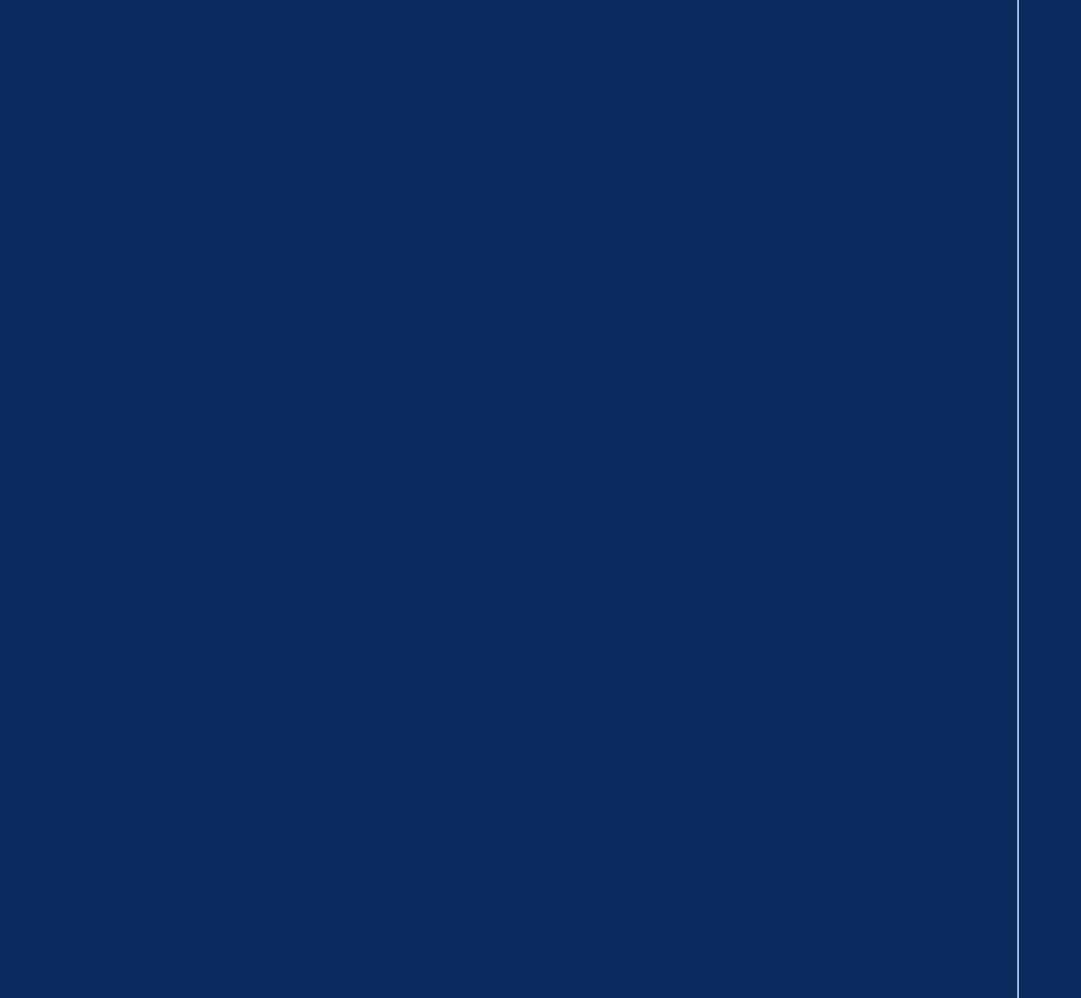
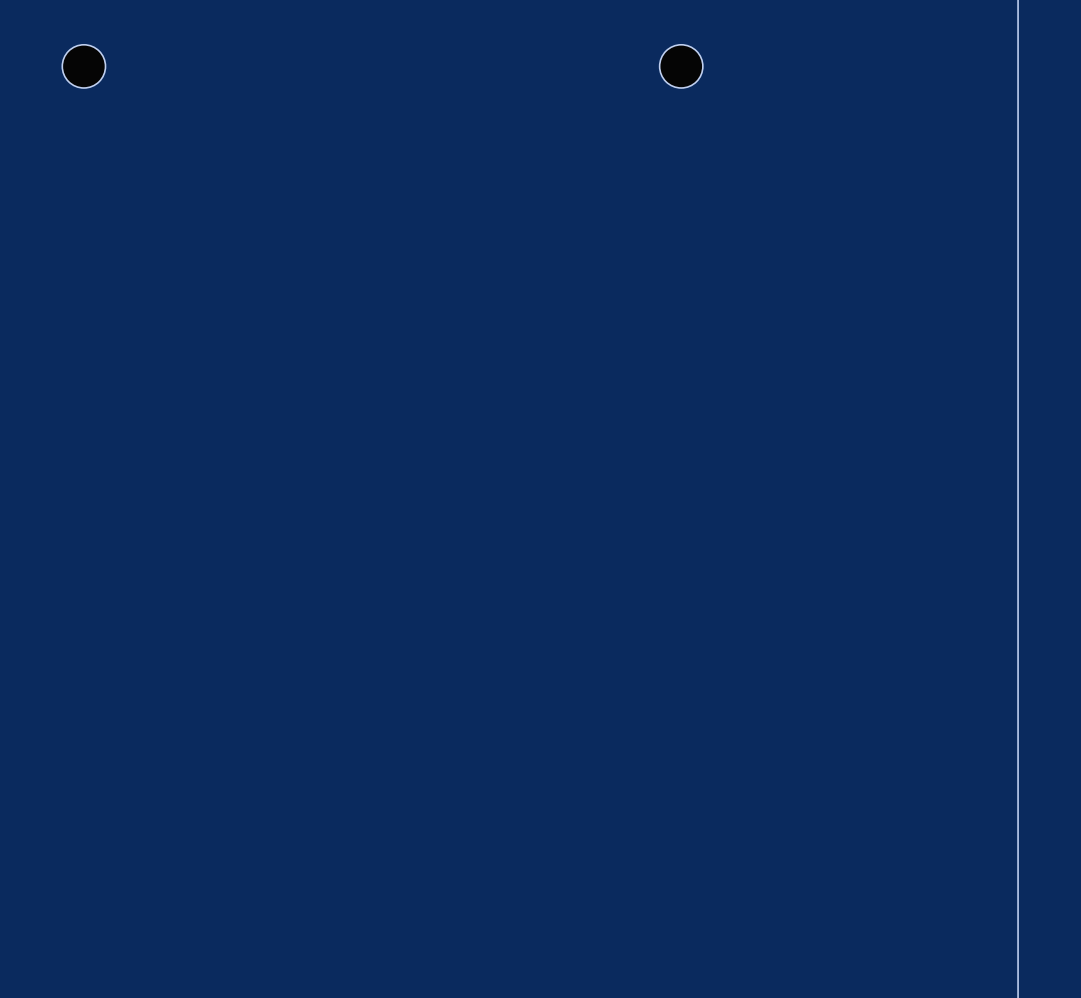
part: none -> (83, 66)
part: none -> (681, 66)

